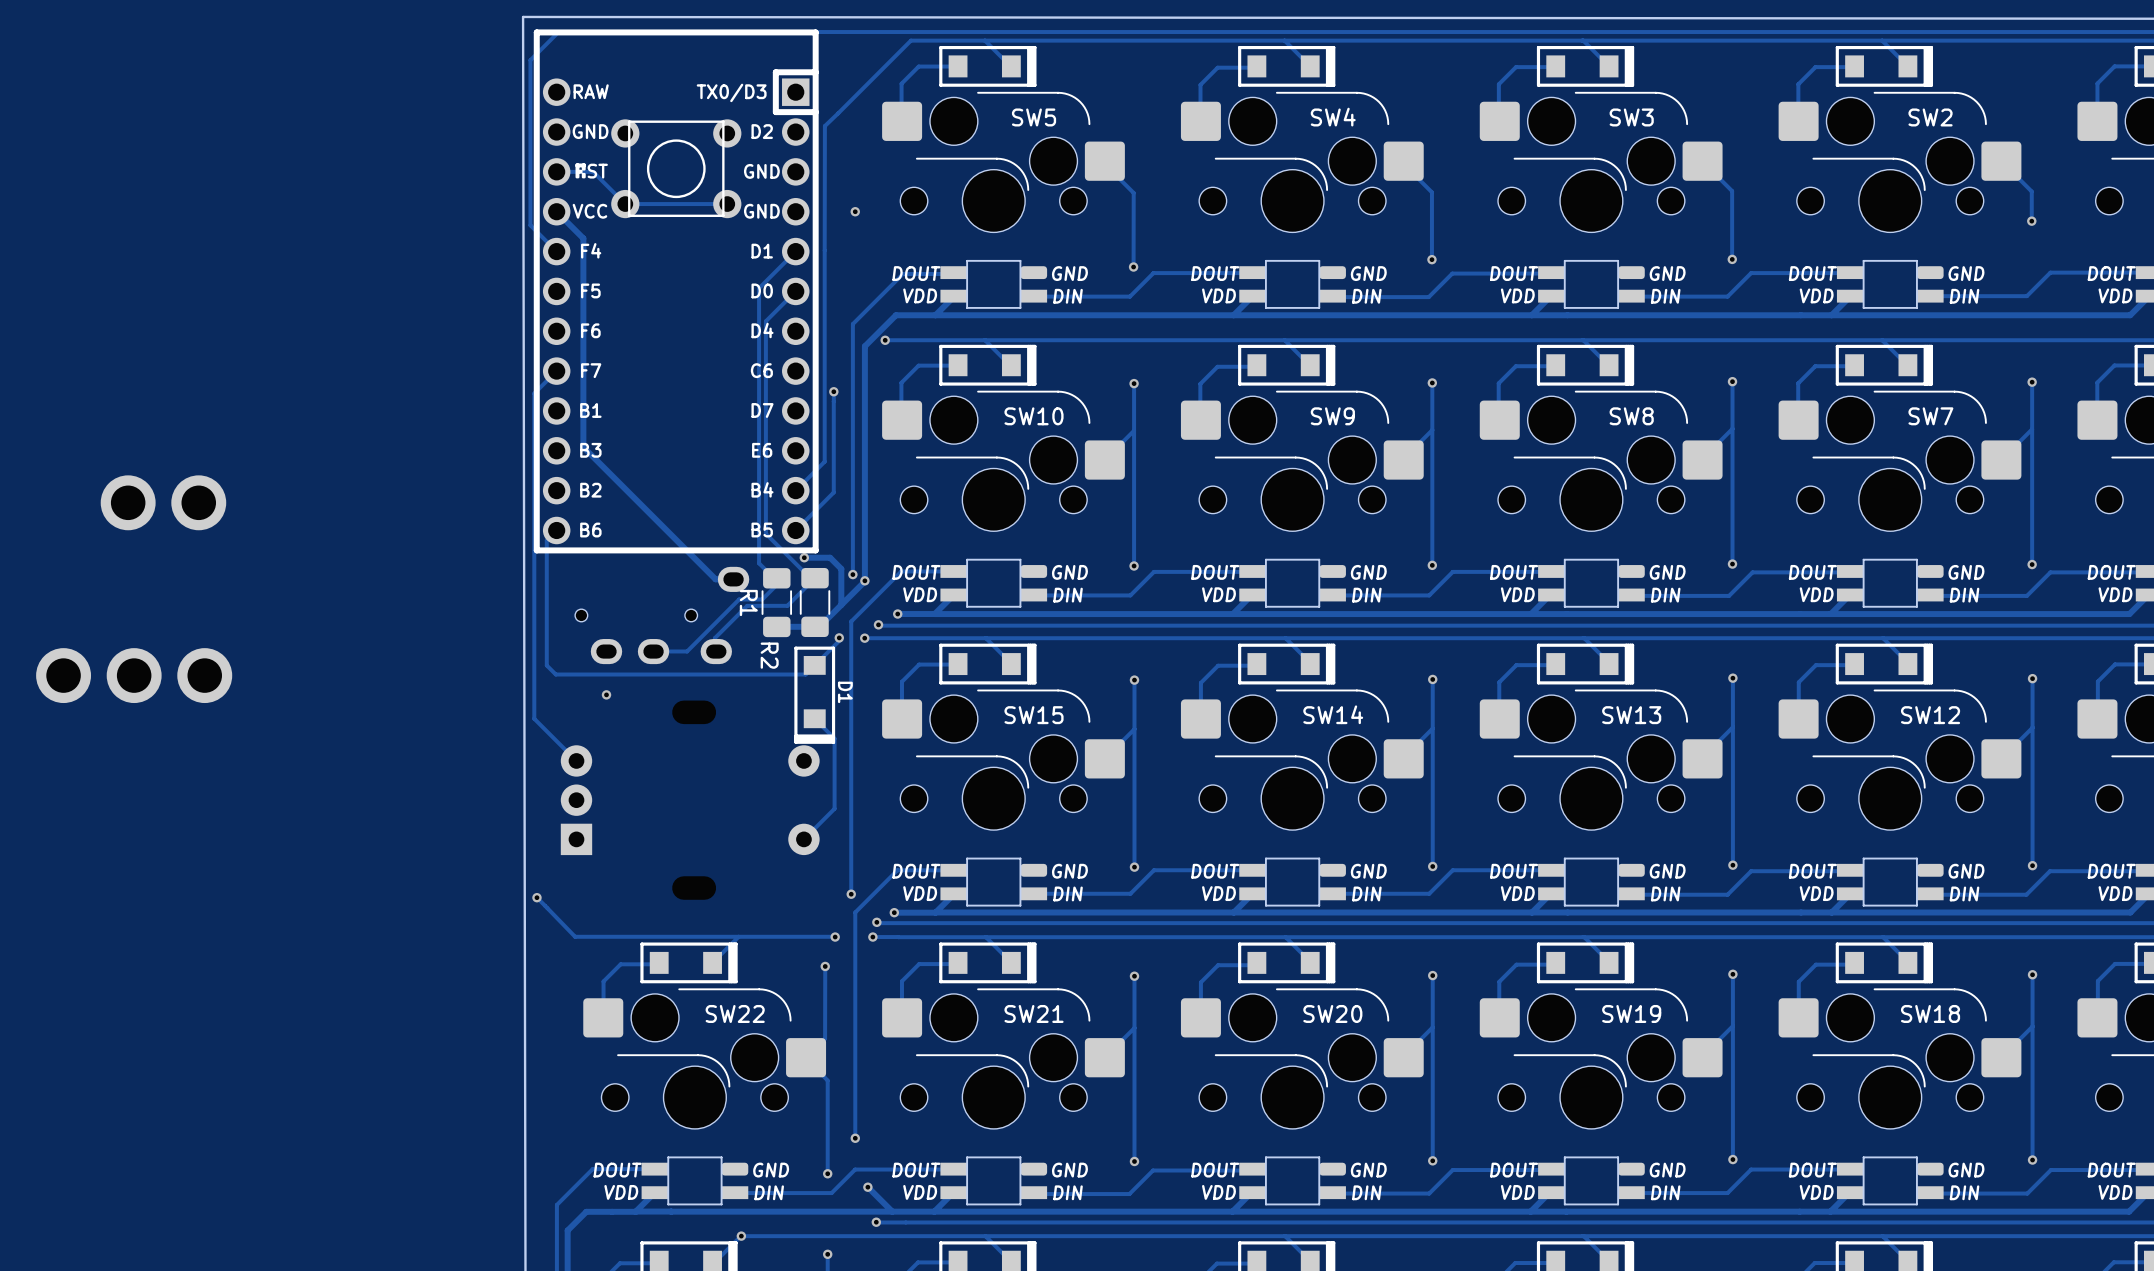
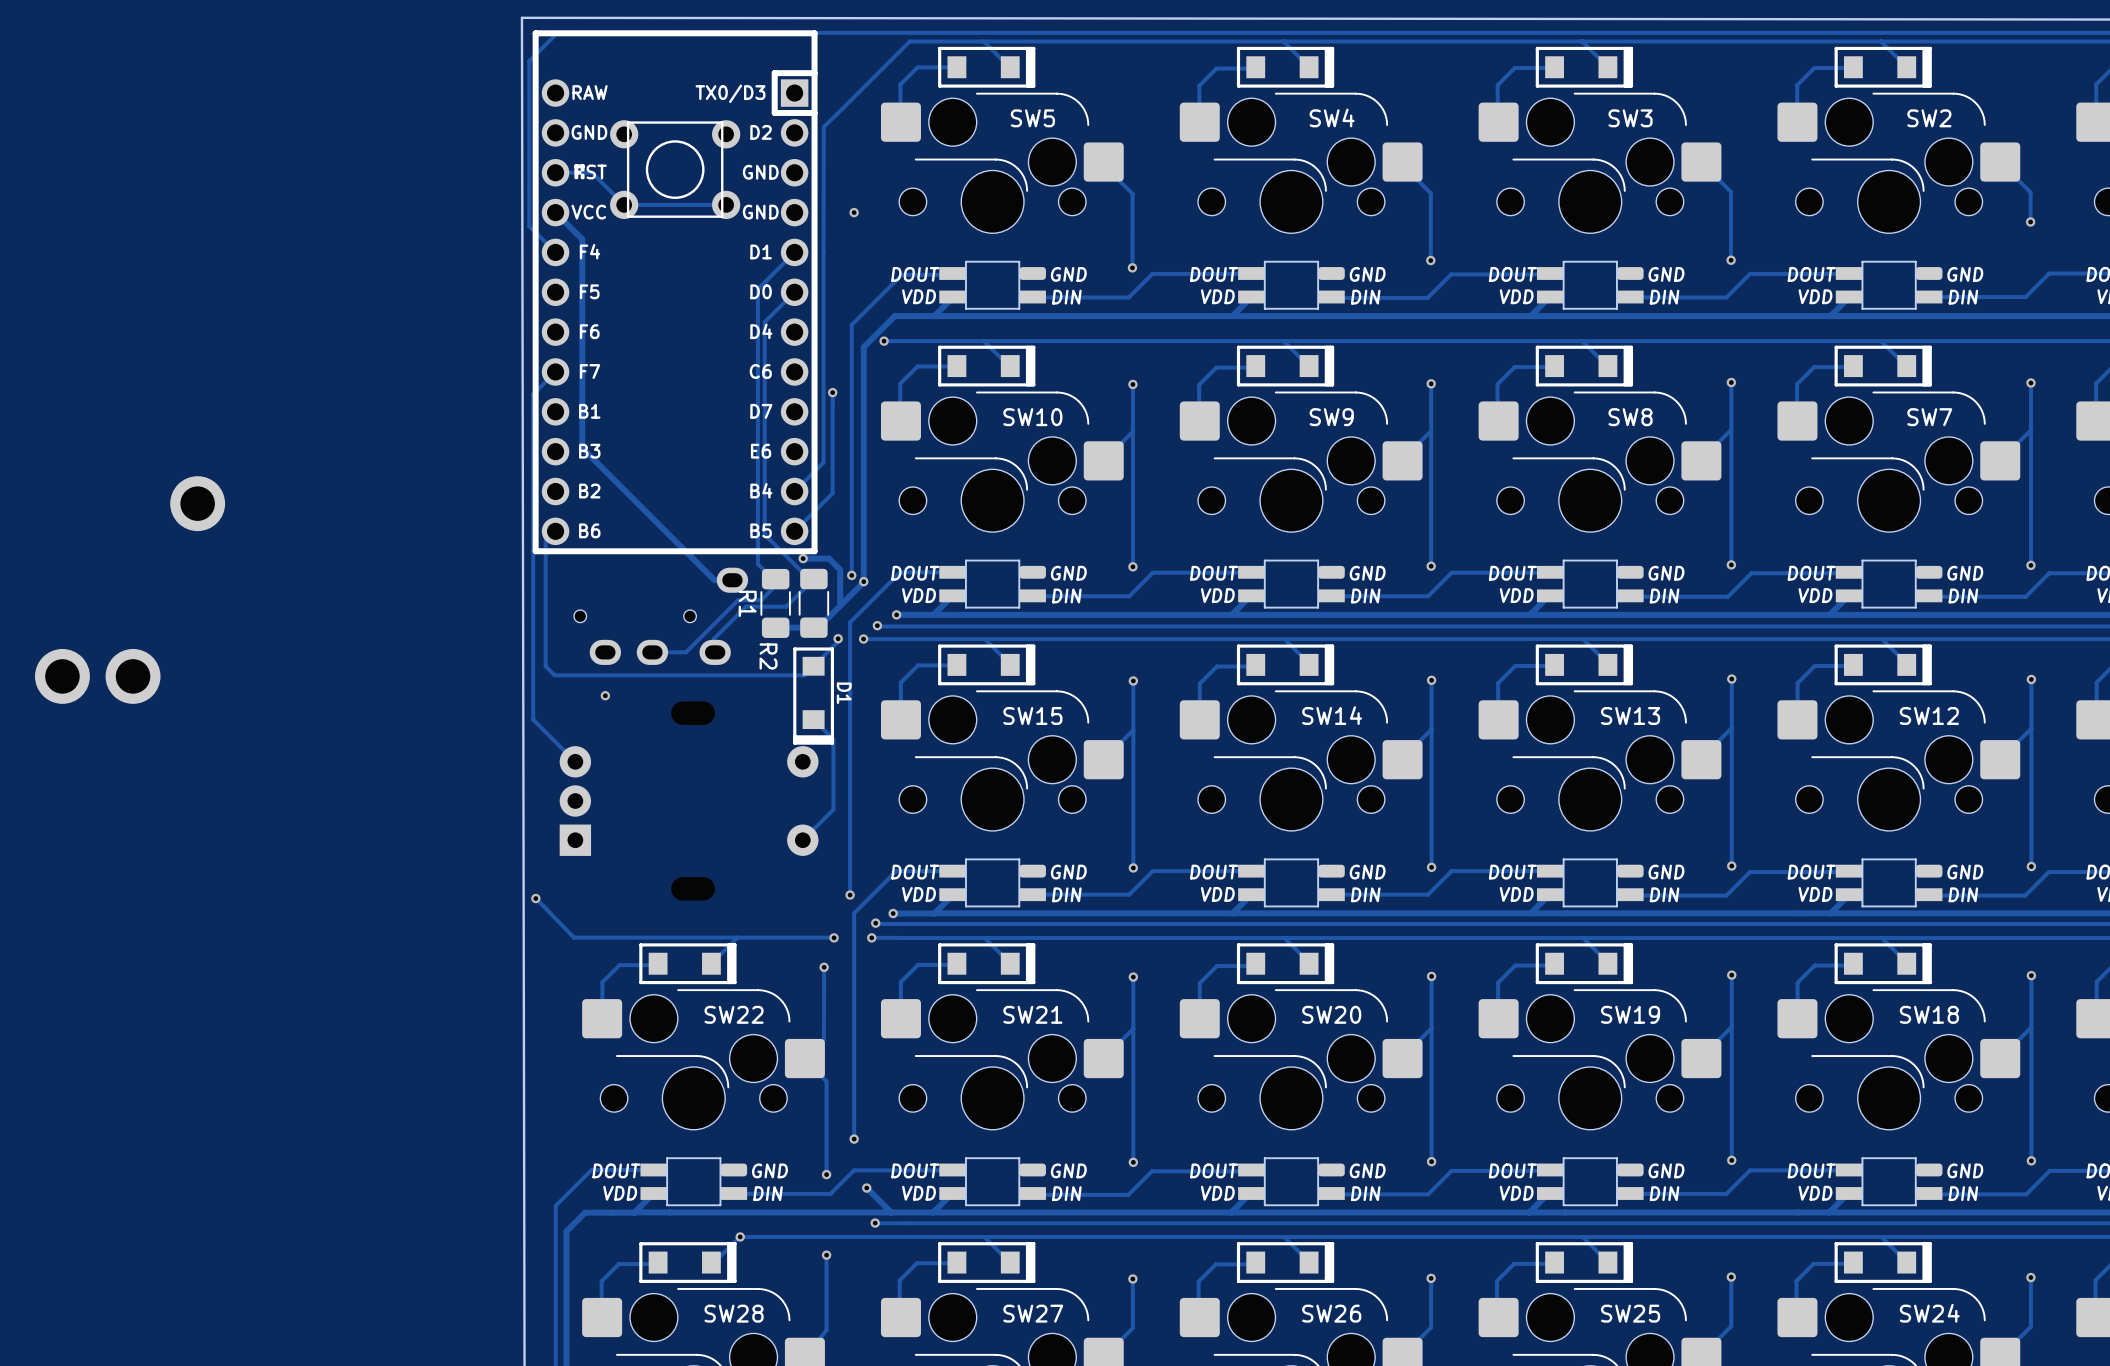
part: (128, 502) -> none
part: (204, 675) -> none

